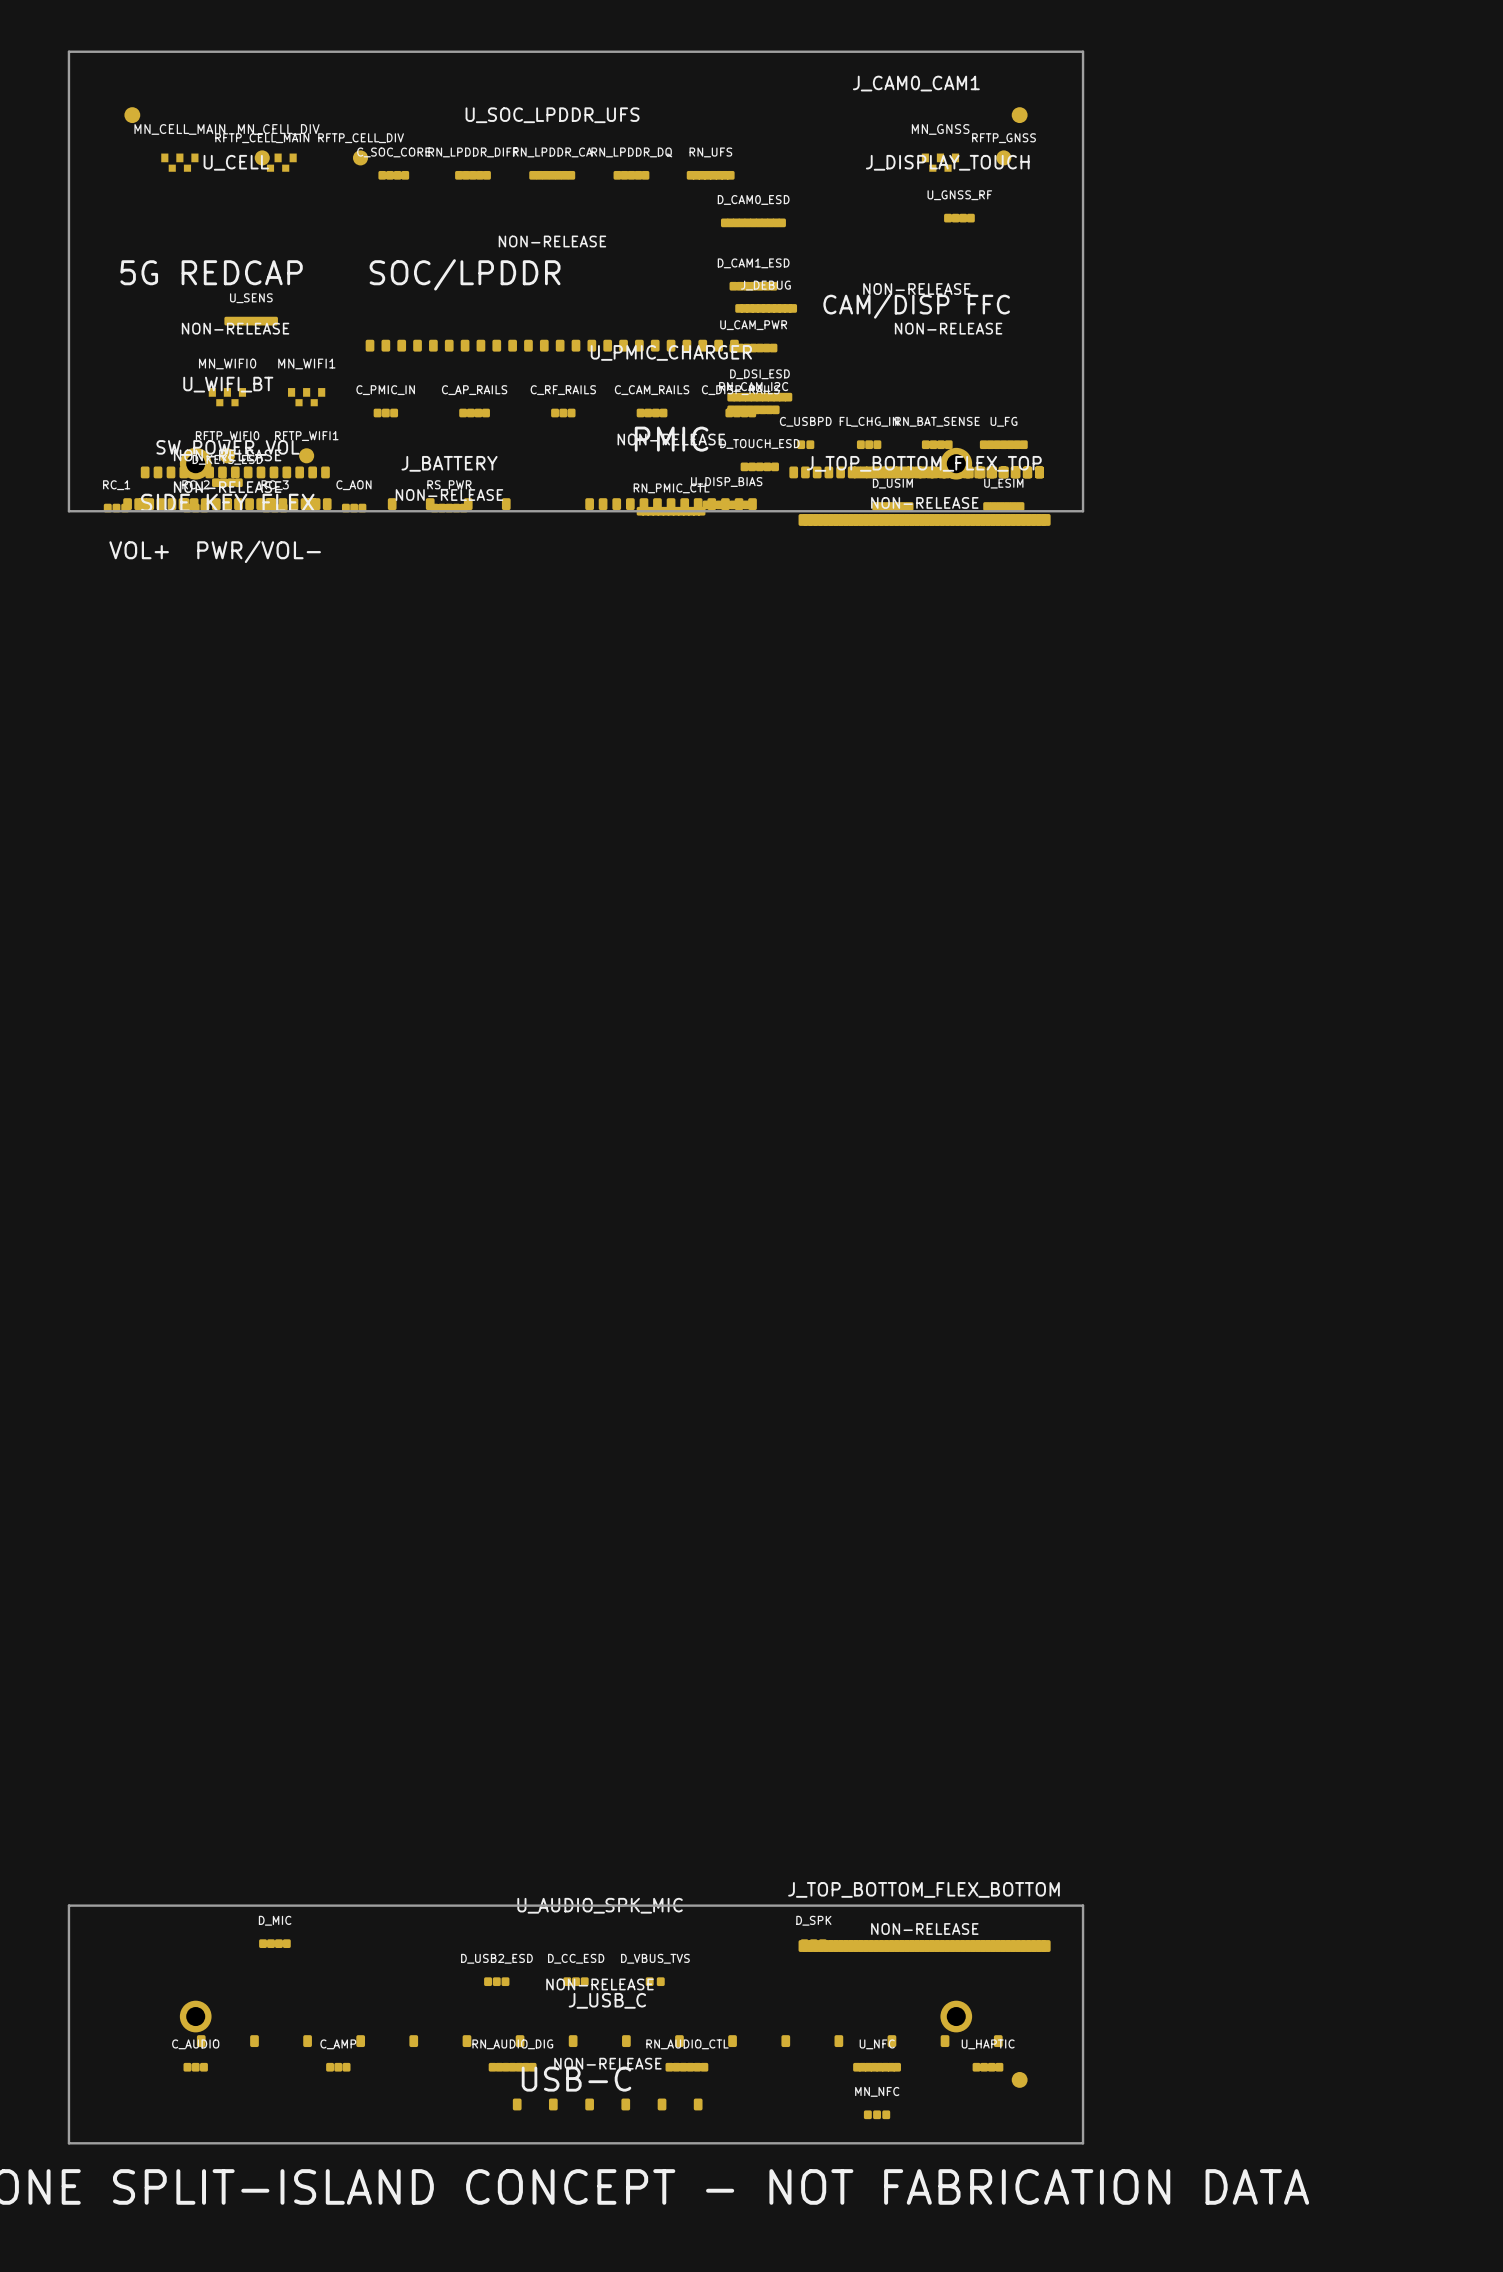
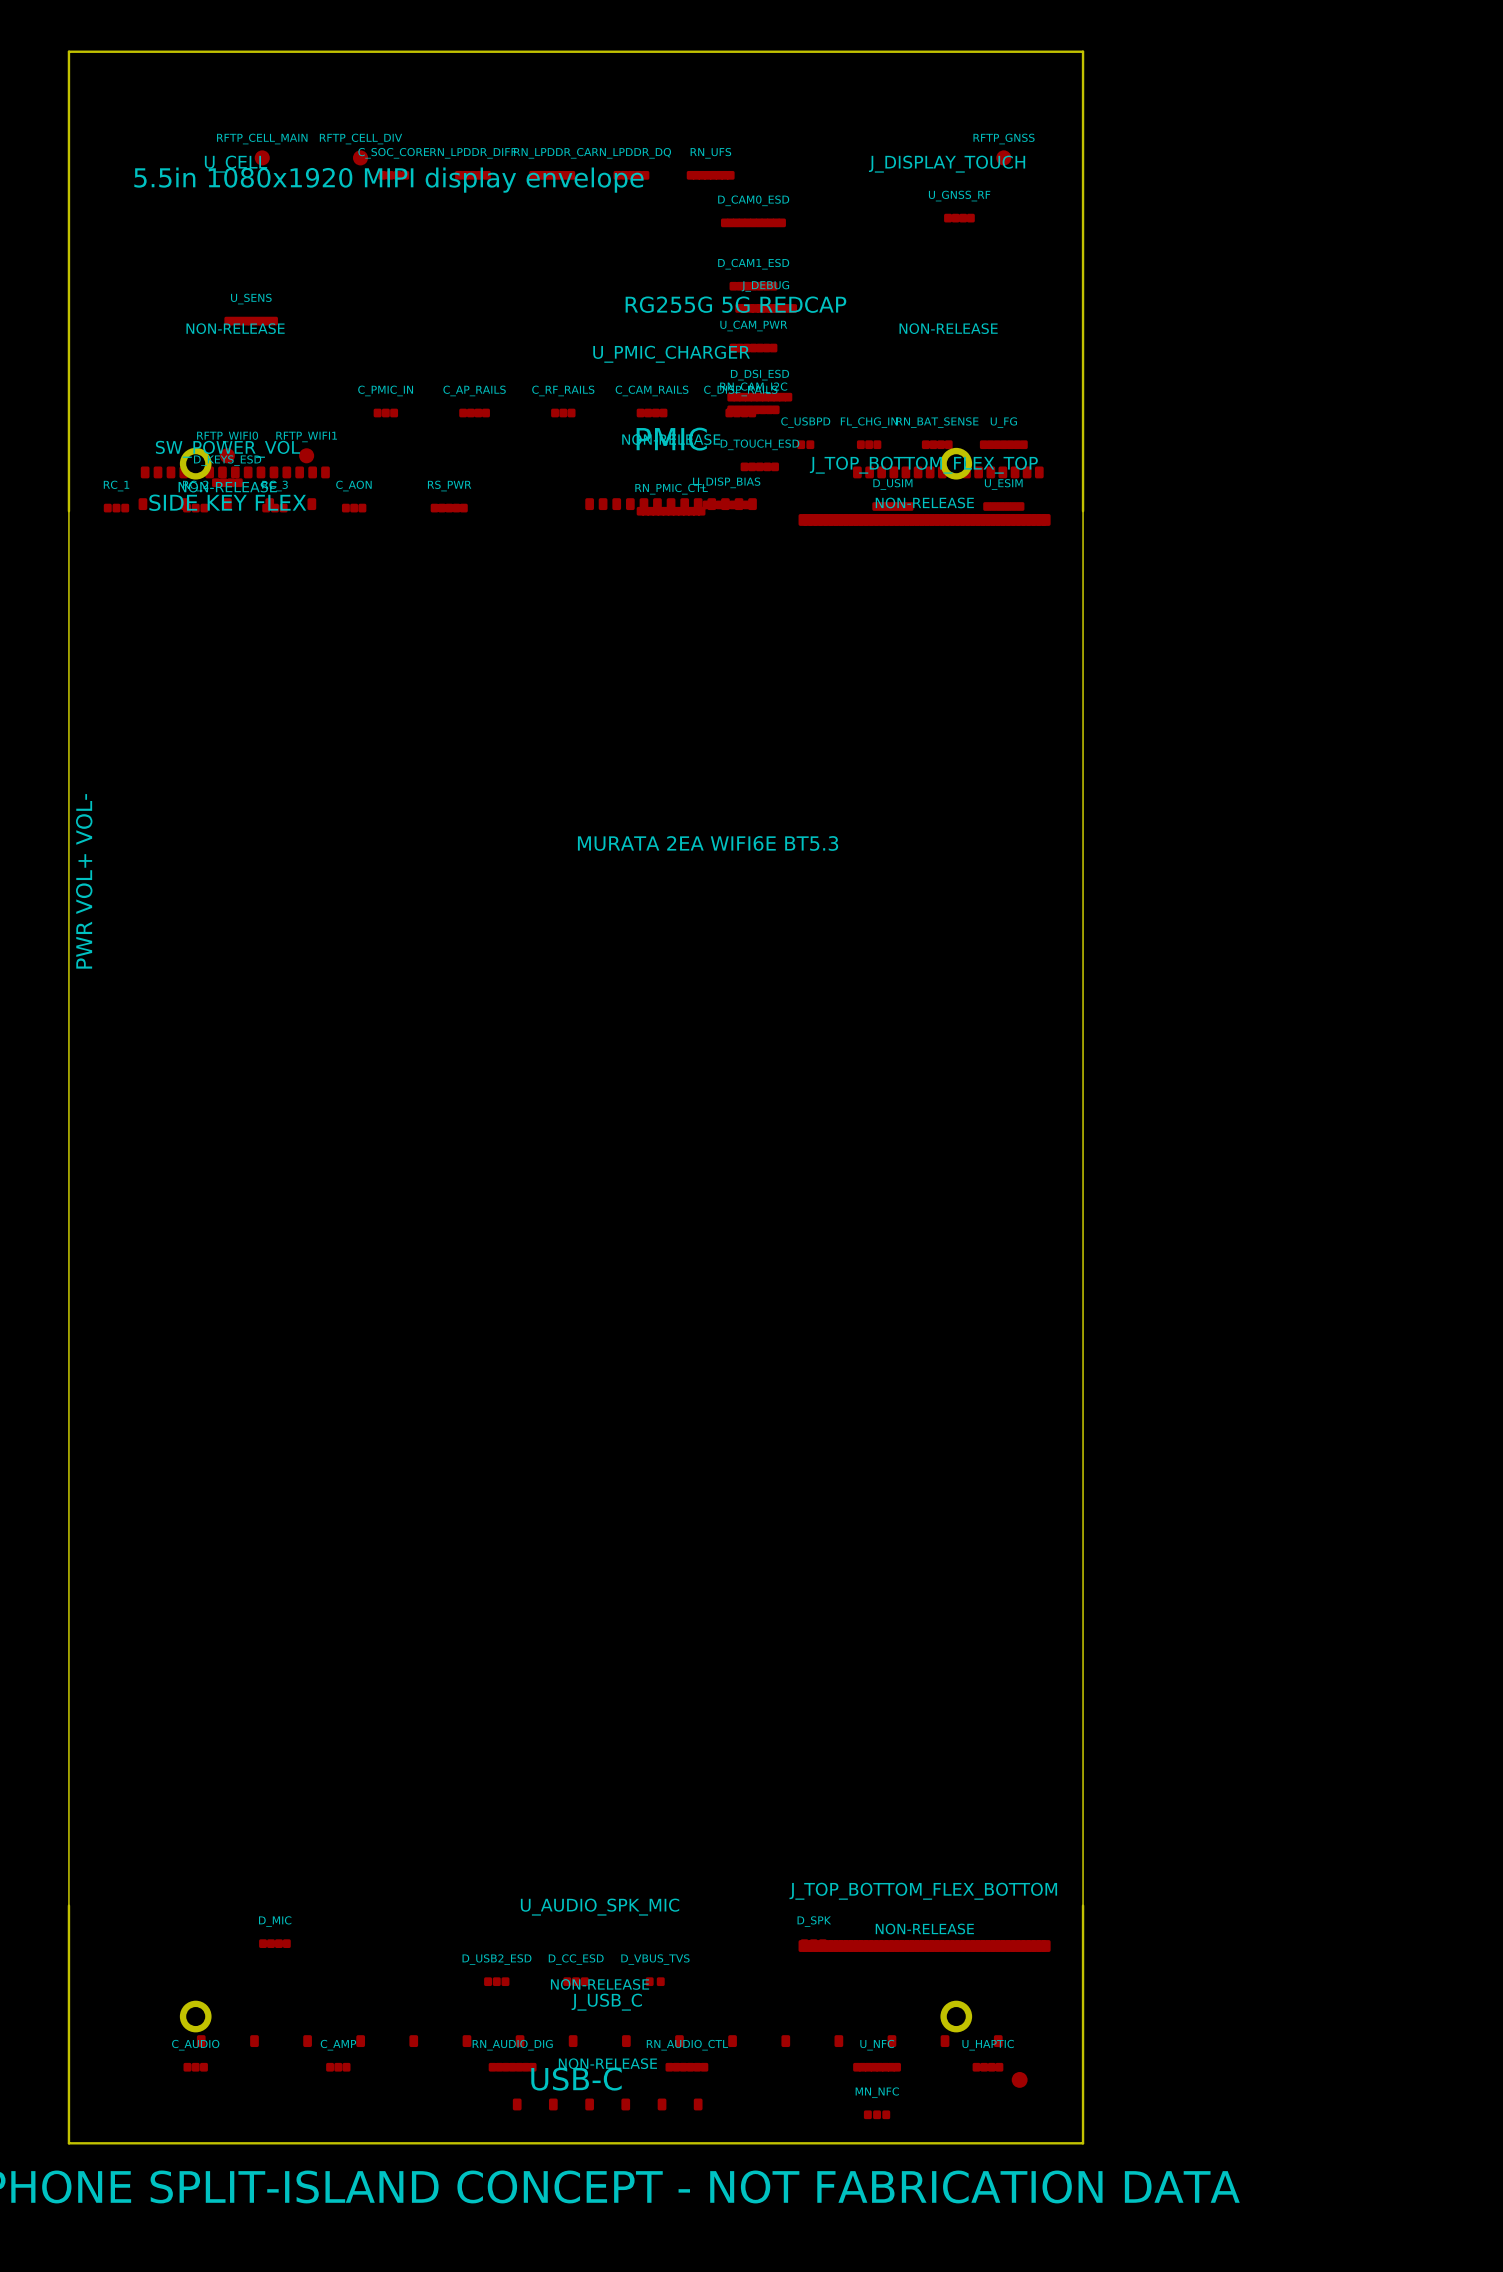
part: (132, 115) -> none
part: (1019, 115) -> none
MN_CELL_MAIN: (179, 162) -> none
MN_CELL_DIV: (278, 162) -> none
MN_GNSS: (940, 162) -> none
text: none -> 5.5in 1080x1920 MIPI display envelope (388, 180)
text: 5G REDCAP (211, 272) -> none
text: SOC/LPDDR (465, 274) -> none
text: none -> RG255G 5G REDCAP (735, 304)
text: CAM/DISP FFC (916, 306) -> none
U_SOC_LPDDR_UFS: (552, 345) -> none
MN_WIFI0: (227, 397) -> none
MN_WIFI1: (306, 397) -> none
J_CAM0_CAM1: (916, 472) -> none
U_WIFI_BT: (227, 504) -> none
J_BATTERY: (449, 504) -> none
board edge: (68, 511) (1083, 511) -> (68, 511) (68, 1905)
text: VOL+ (139, 550) -> none
text: PWR/VOL- (259, 551) -> none
text: none -> MURATA 2EA WIFI6E BT5.3 (708, 843)
text: none -> PWR VOL+ VOL- (84, 881)
board edge: (68, 1905) (1083, 1905) -> (1083, 511) (1083, 1905)

